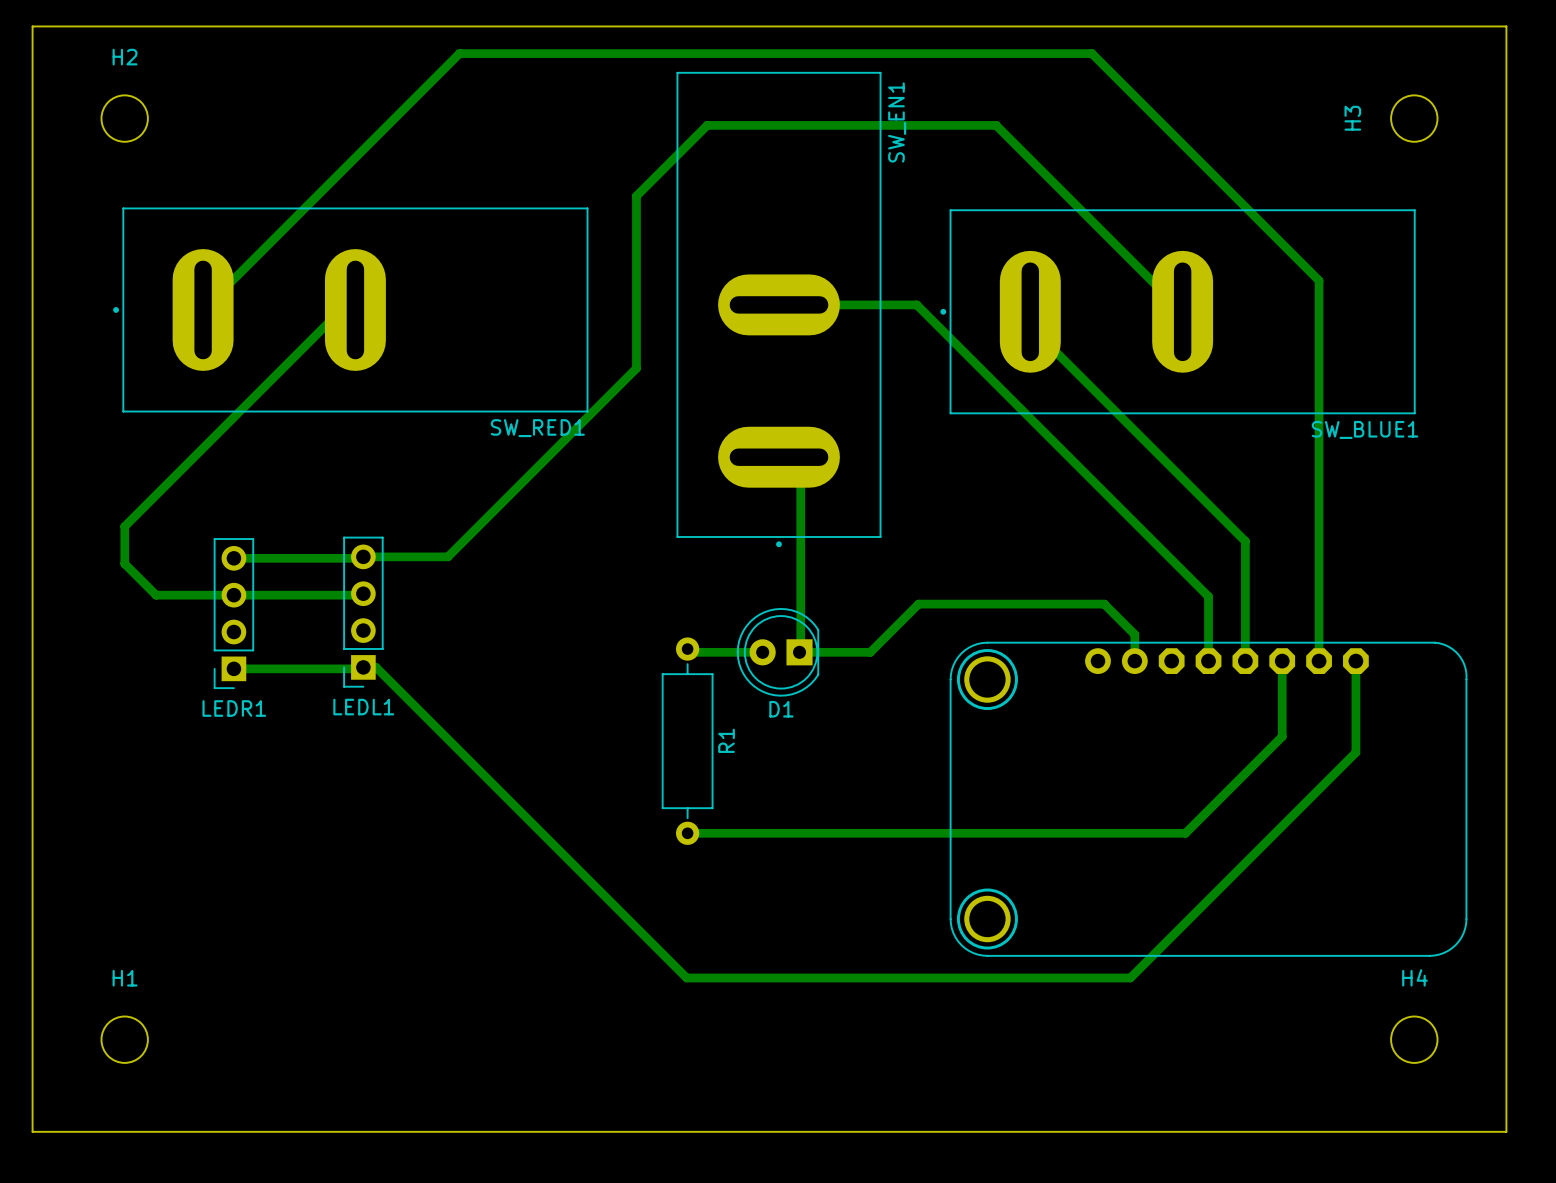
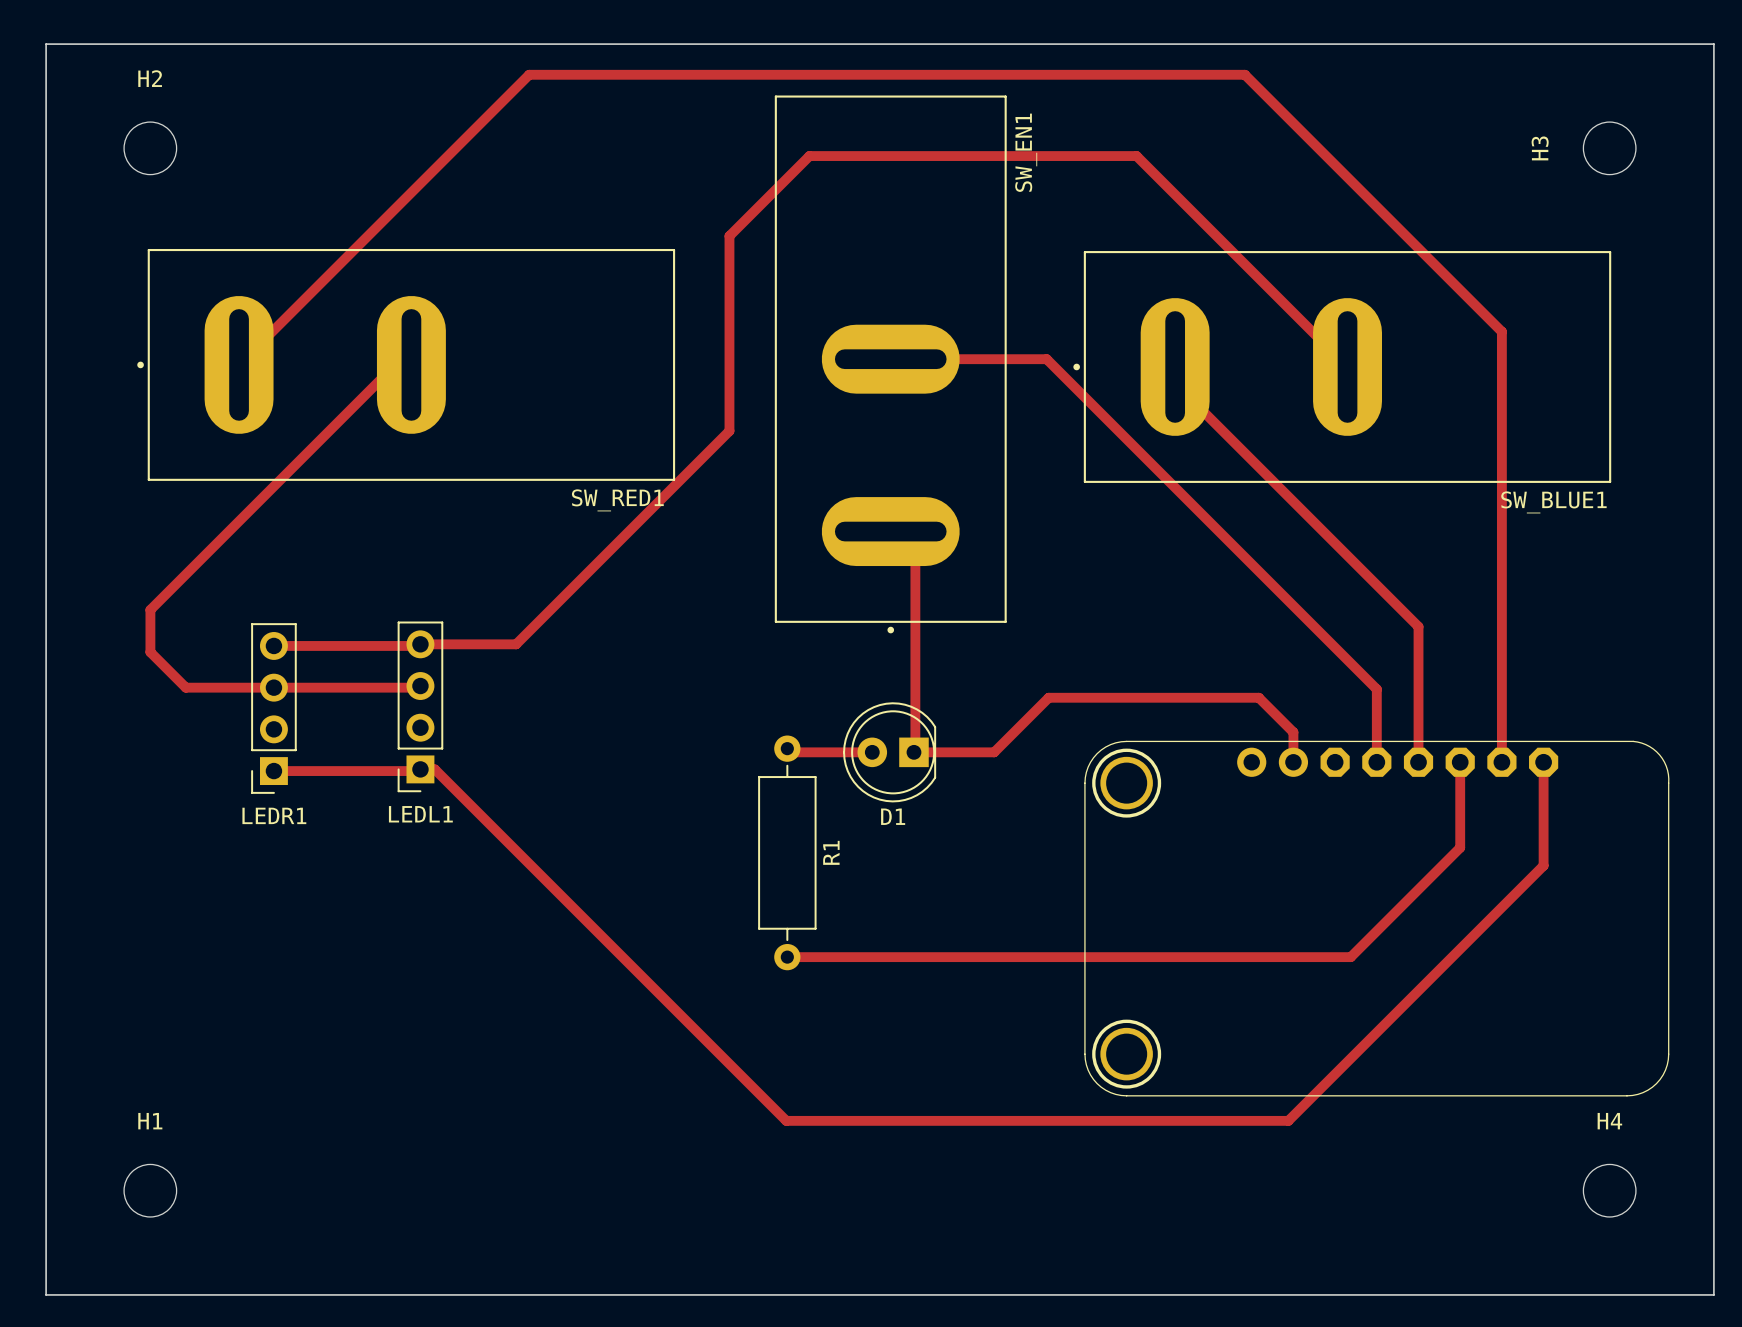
bottom track: (778, 304) (916, 304) (1208, 596) (1208, 661) -> none
top track: none -> (890, 359) (1046, 359) (1376, 689) (1376, 762)
bottom track: (203, 309) (459, 53) (1091, 53) (1319, 280) (1319, 661) -> none
top track: none -> (239, 364) (529, 74) (1244, 74) (1501, 331) (1501, 762)
bottom track: (1030, 311) (1030, 326) (1245, 541) (1245, 661) -> none
top track: none -> (1175, 366) (1175, 383) (1418, 626) (1418, 762)
bottom track: (1182, 311) (996, 125) (707, 125) (636, 196) (636, 368) (447, 556) (233, 558) -> none
top track: none -> (1347, 366) (1136, 156) (809, 156) (729, 236) (729, 431) (516, 644) (273, 645)
bottom track: (355, 343) (355, 309) (341, 309) (124, 526) (124, 563) (156, 595) (363, 593) -> none
top track: none -> (411, 402) (411, 364) (395, 364) (150, 609) (150, 652) (185, 687) (418, 687) (420, 686)
bottom track: (778, 457) (800, 478) (799, 652) (870, 652) (918, 604) (1104, 604) (1134, 634) (1134, 661) -> none
top track: none -> (890, 531) (915, 556) (913, 752) (994, 752) (1048, 697) (1258, 697) (1293, 732) (1293, 762)
bottom track: (687, 649) (690, 652) (762, 652) -> none
top track: none -> (787, 748) (791, 752) (872, 752)
bottom track: (1282, 661) (1282, 736) (1185, 833) (687, 833) -> none
top track: none -> (1460, 762) (1460, 847) (1350, 957) (787, 957)
bottom track: (1355, 661) (1355, 752) (1130, 977) (686, 977) (376, 667) (233, 668) -> none
top track: none -> (1543, 762) (1543, 865) (1288, 1120) (786, 1120) (434, 769) (273, 771)

